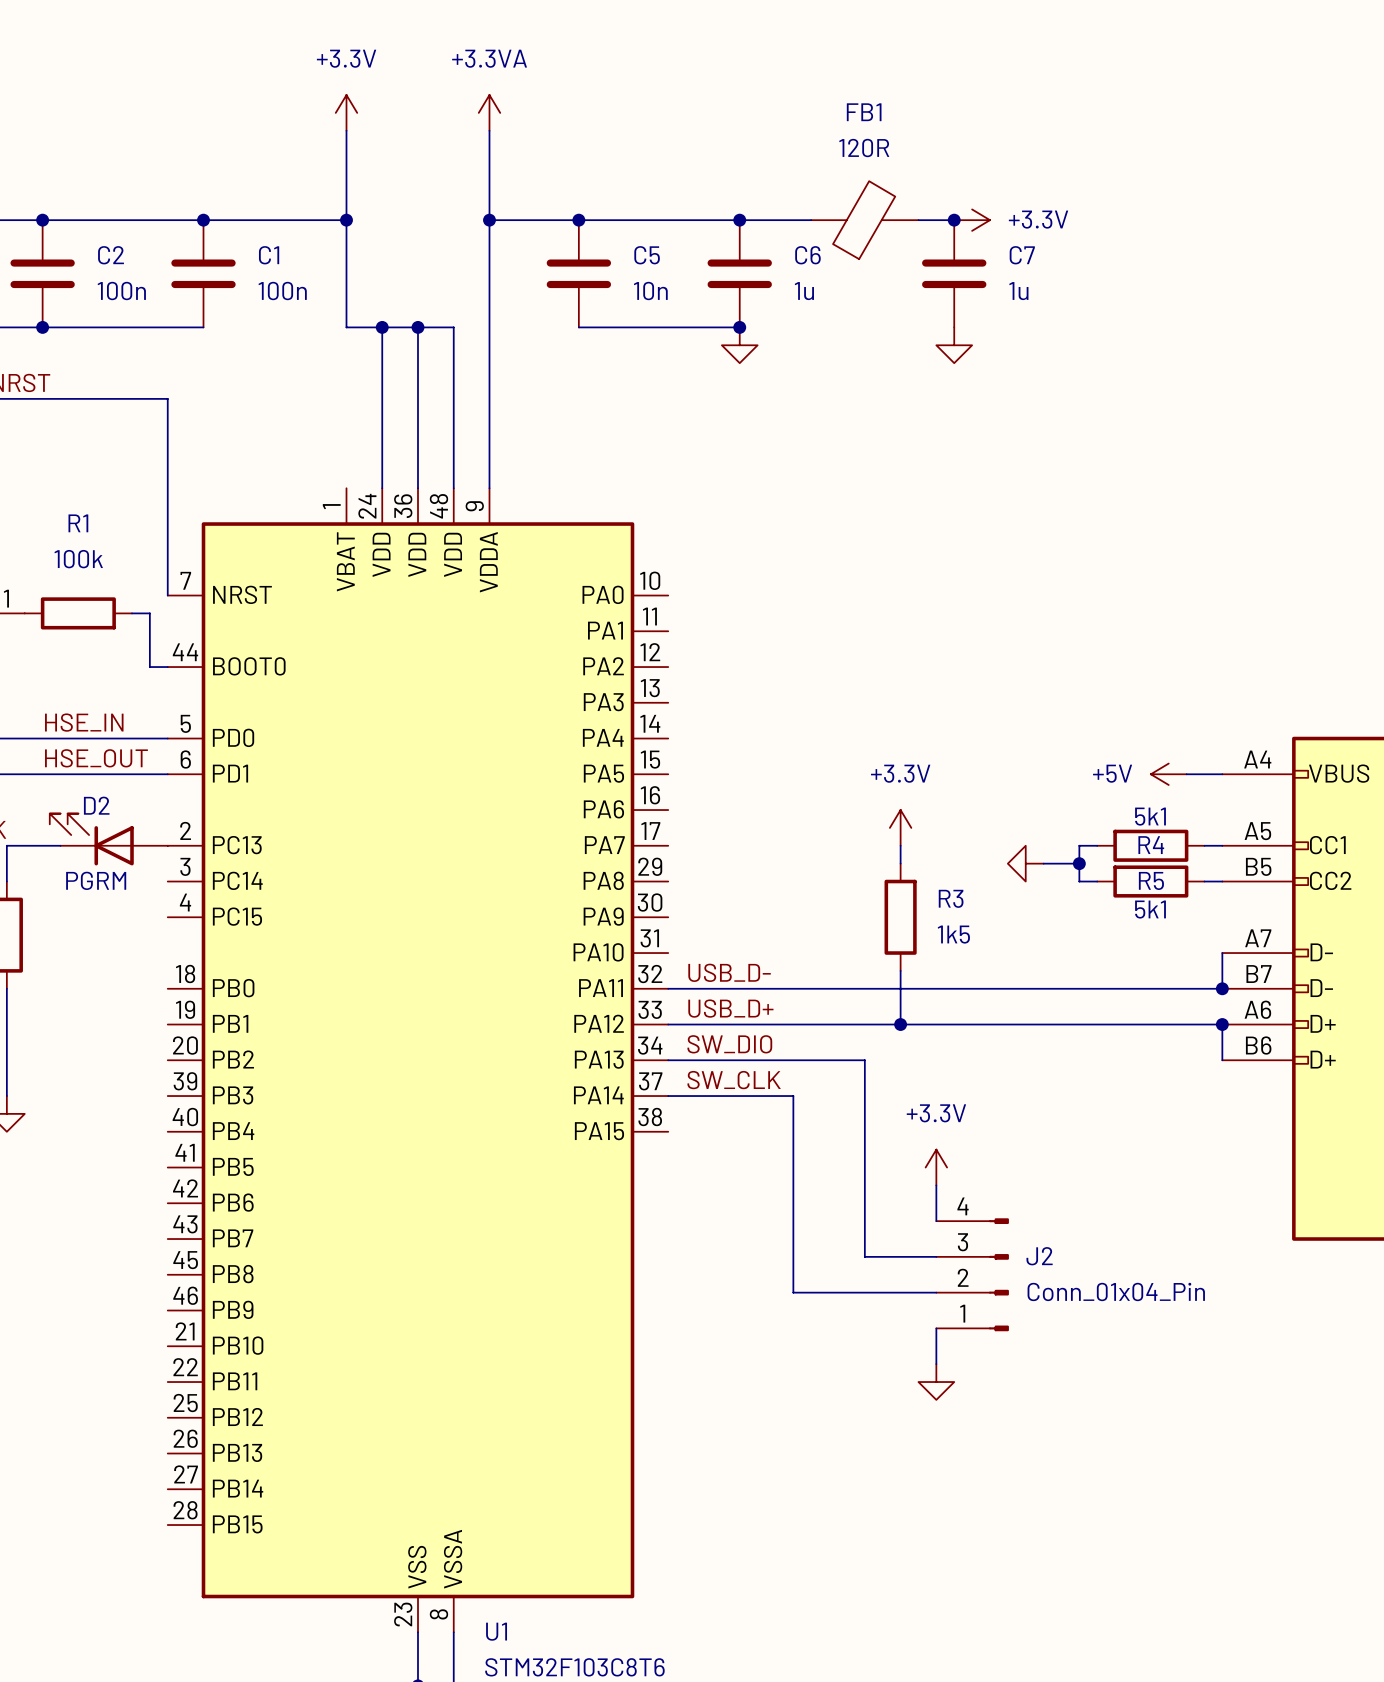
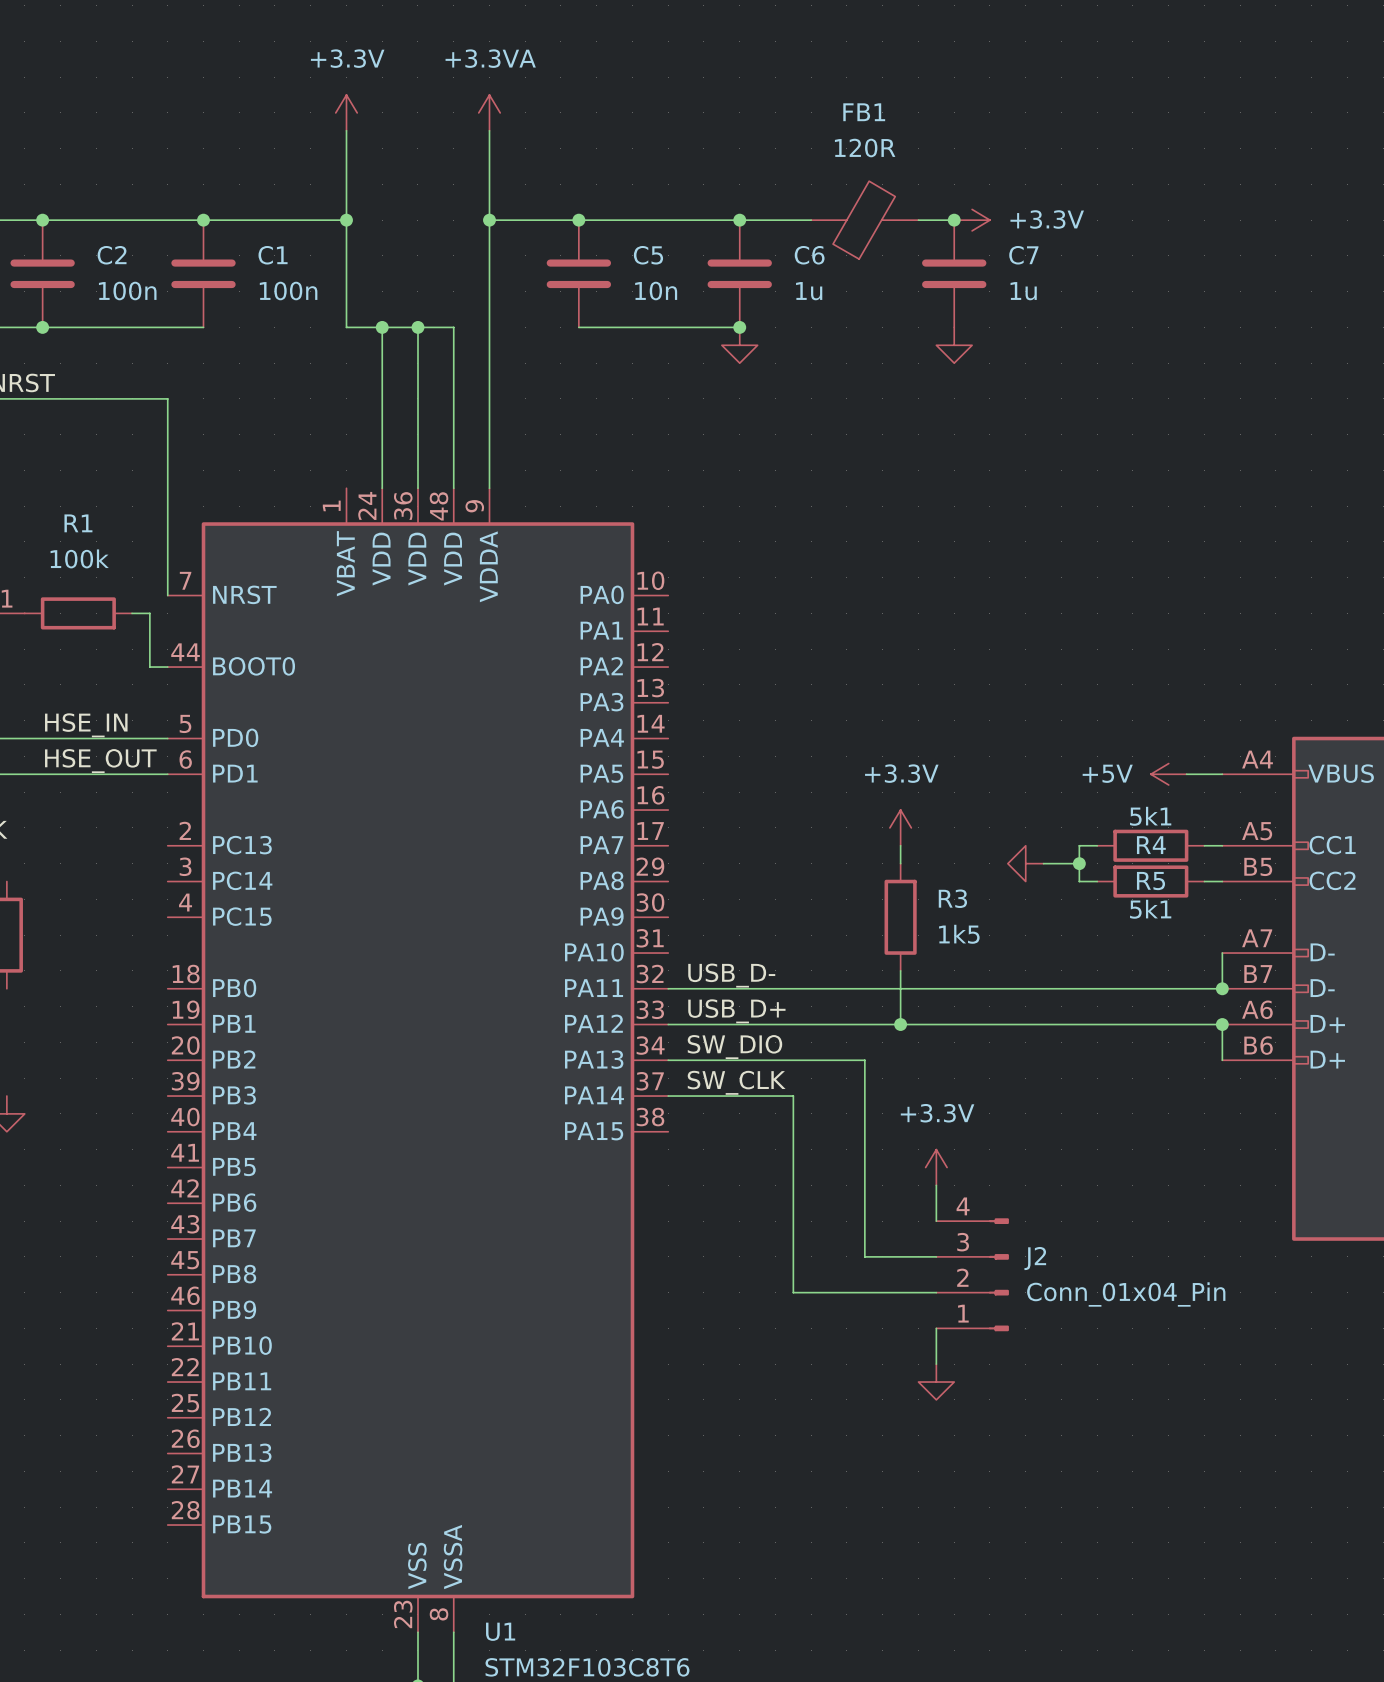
D2: PGRM (108, 839) -> none
wire: (60, 845) (6, 845) (6, 881) -> none
wire: (6, 988) (6, 1096) -> none

